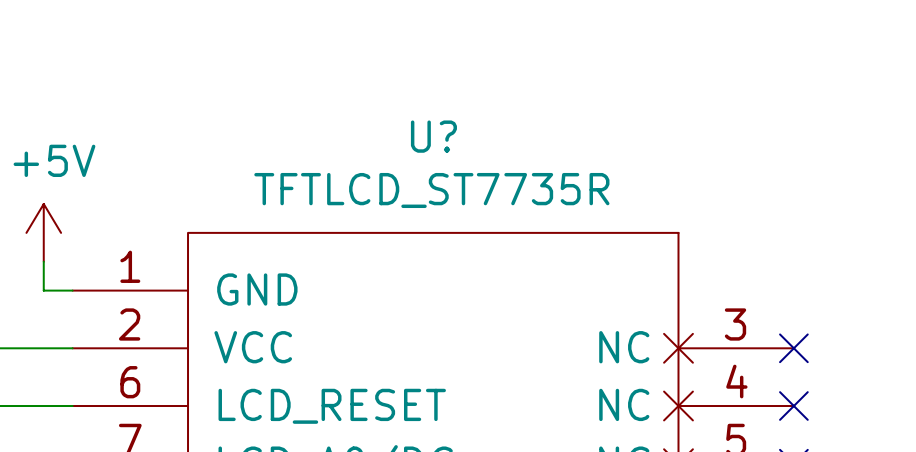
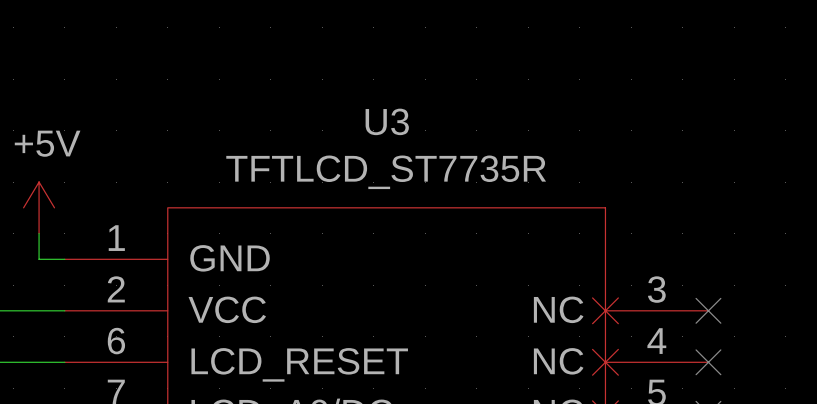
U? name: U? (433, 136) -> U3 (387, 121)

